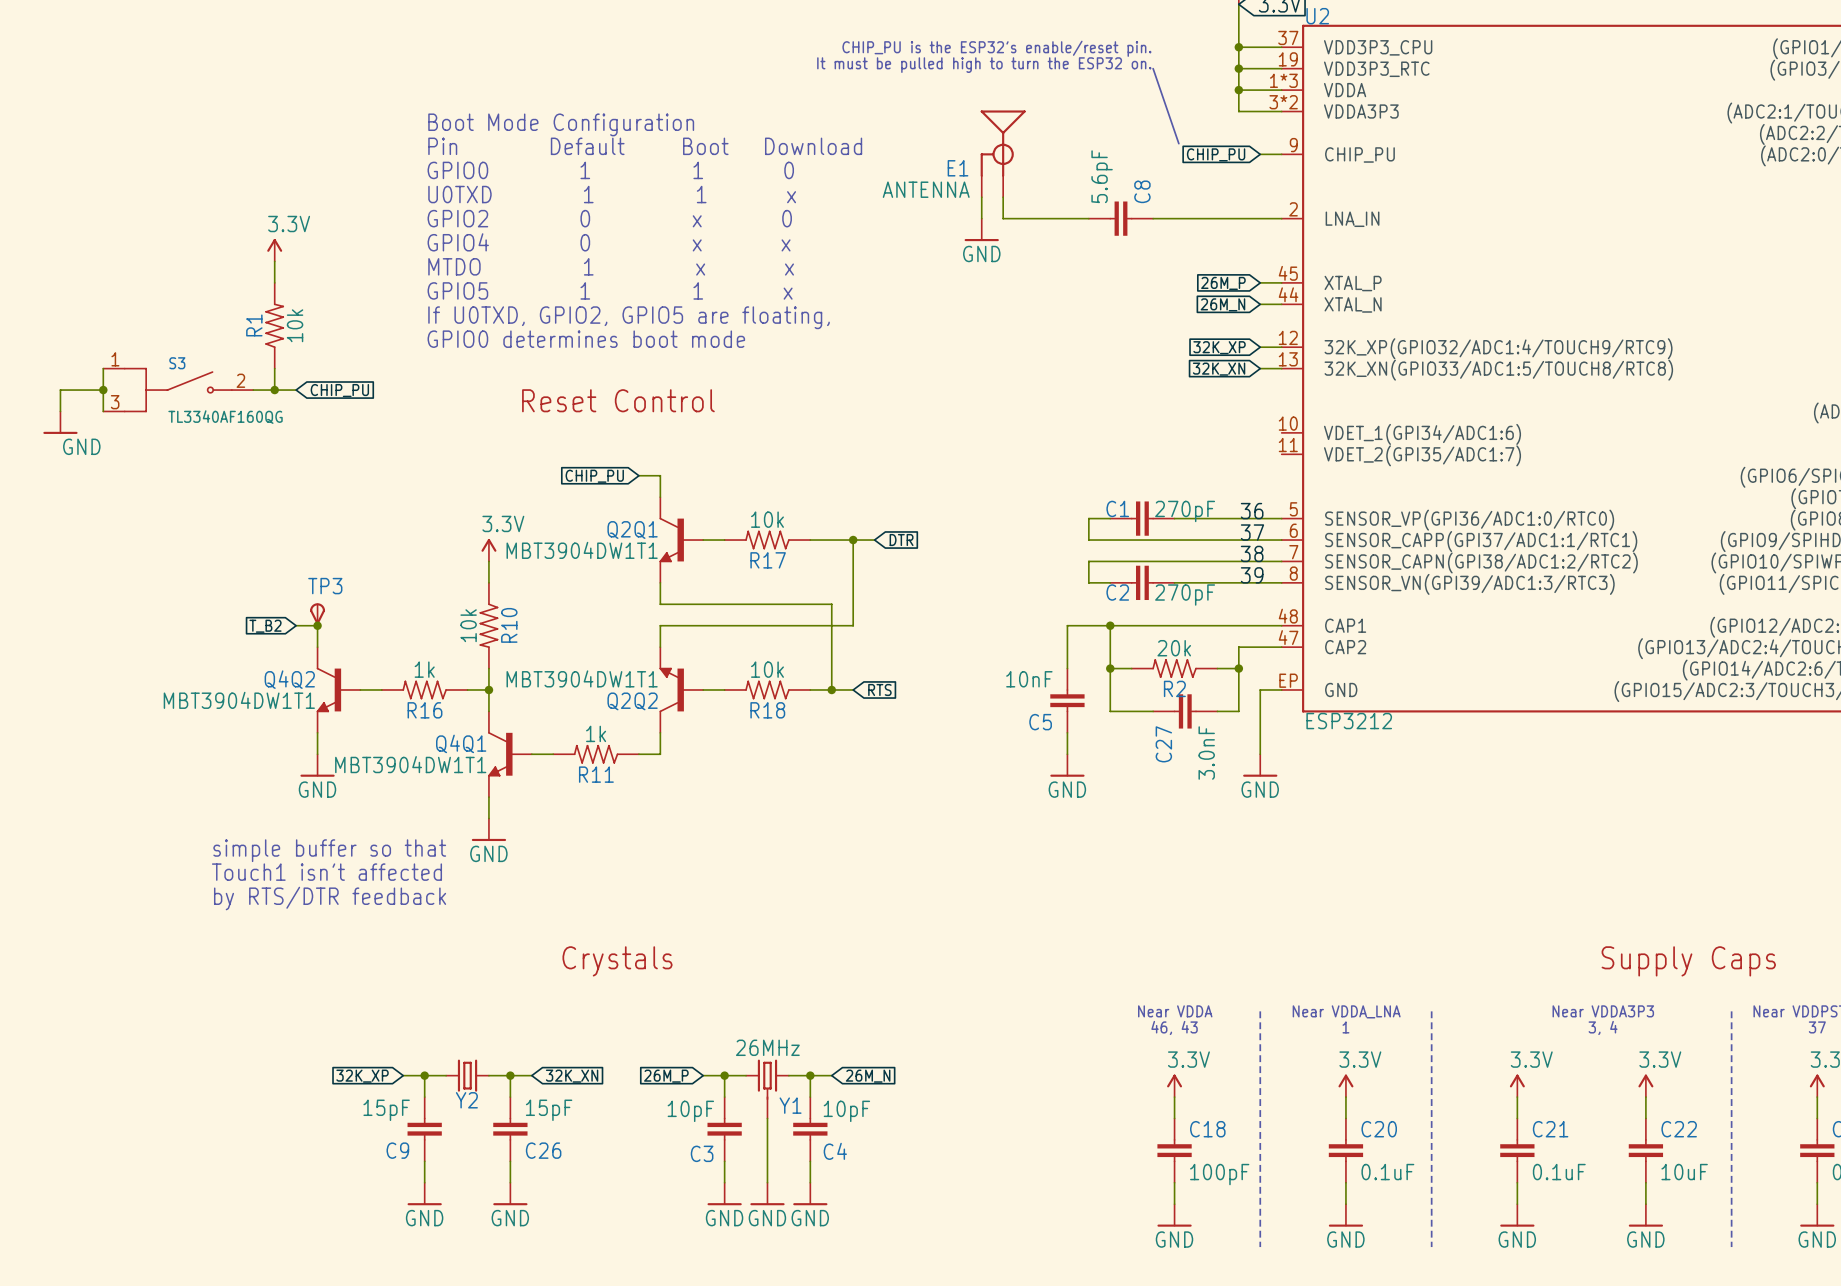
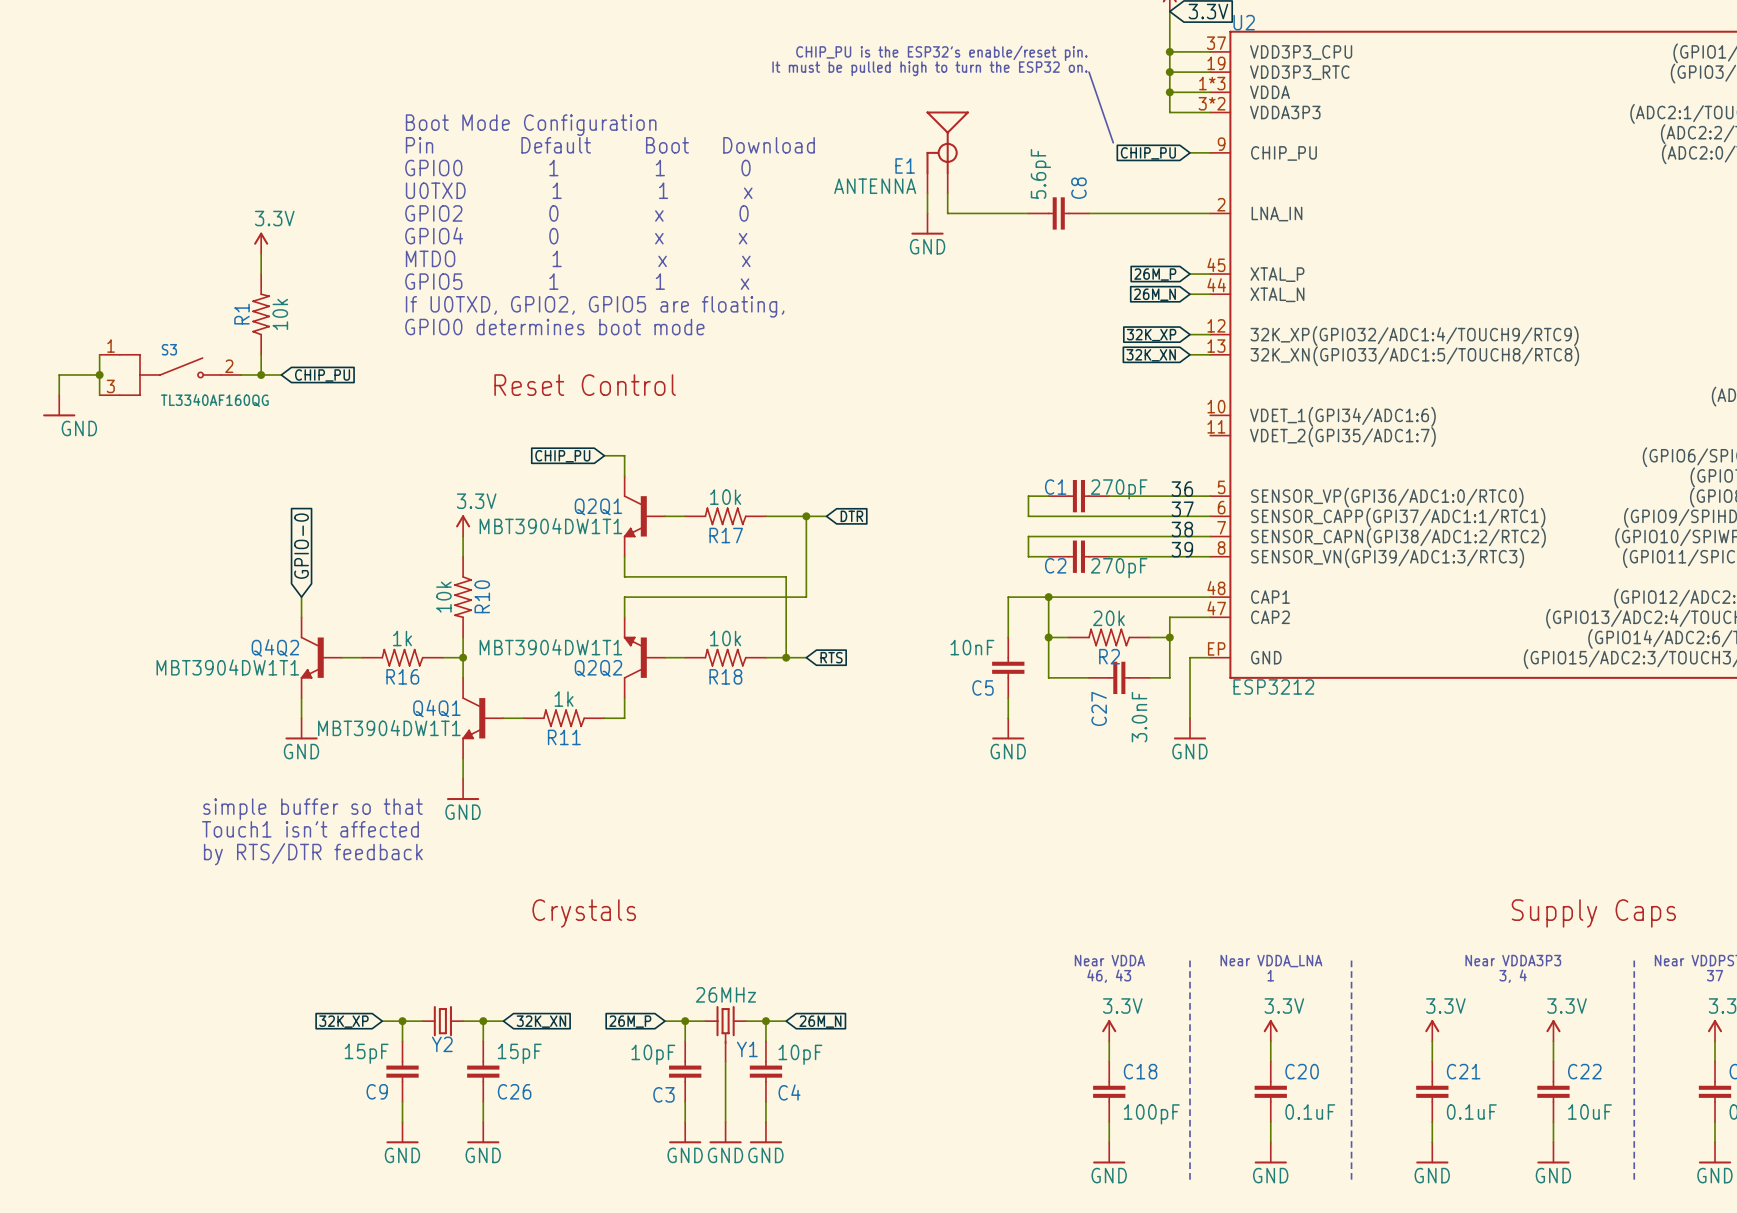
global label: none -> GPIO-0 (301, 546)
TP3: (317, 614) -> none
wire: (296, 625) (317, 625) -> none
junction: (317, 625) -> none
global label: T_B2 (265, 626) -> none

